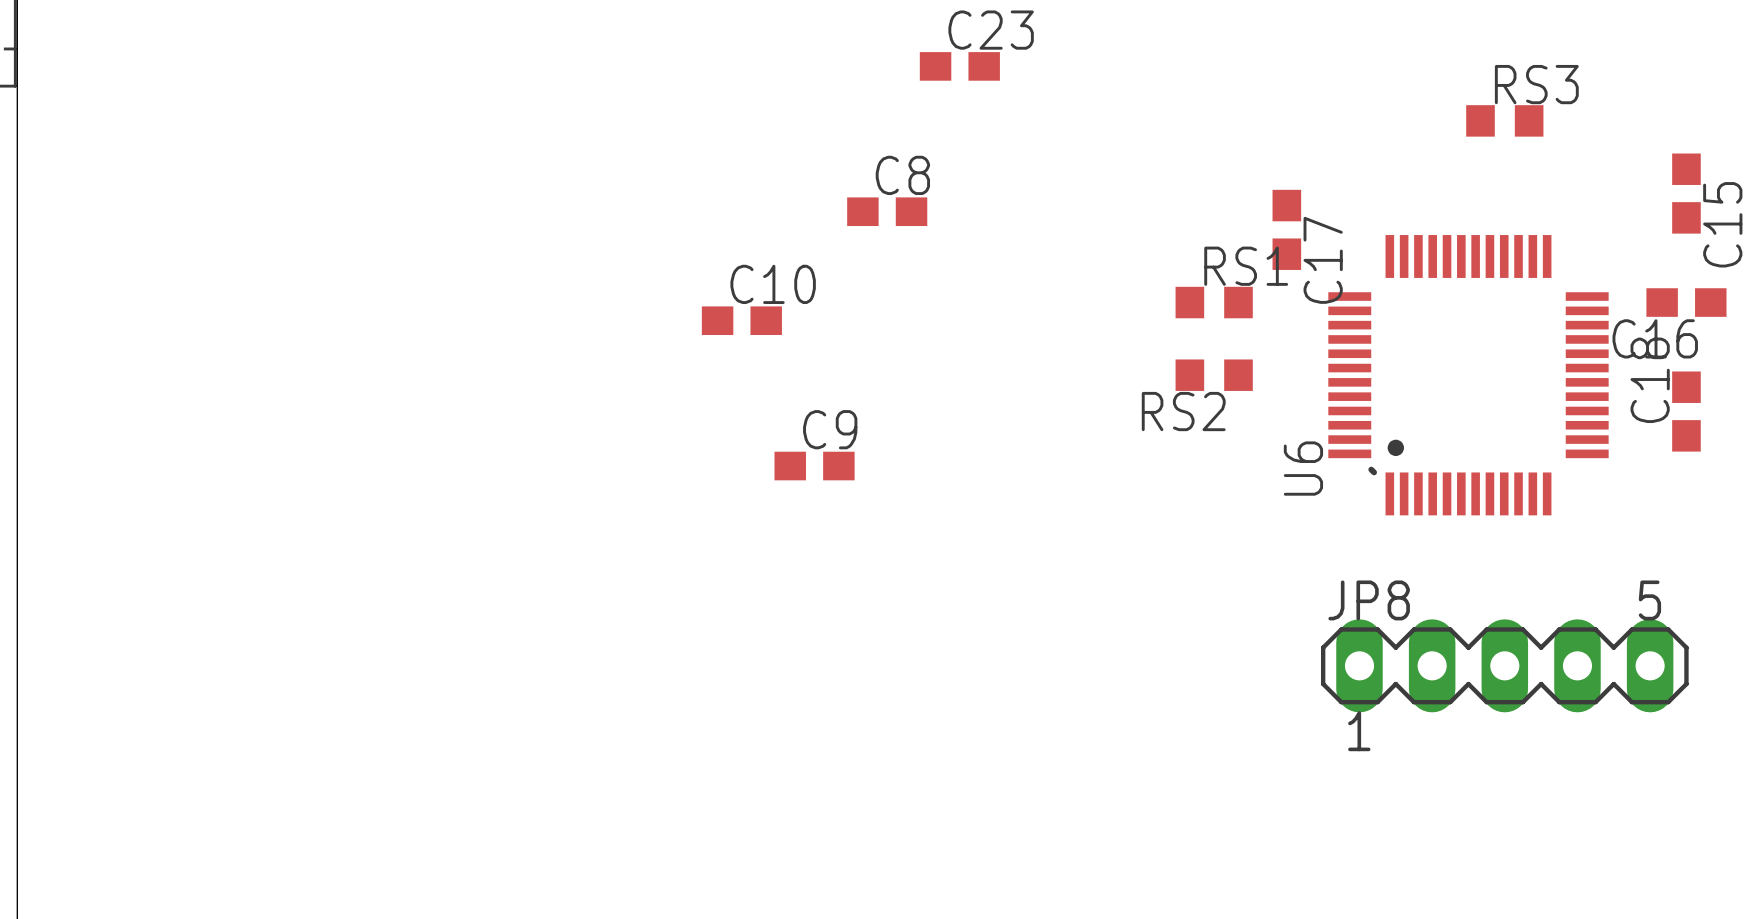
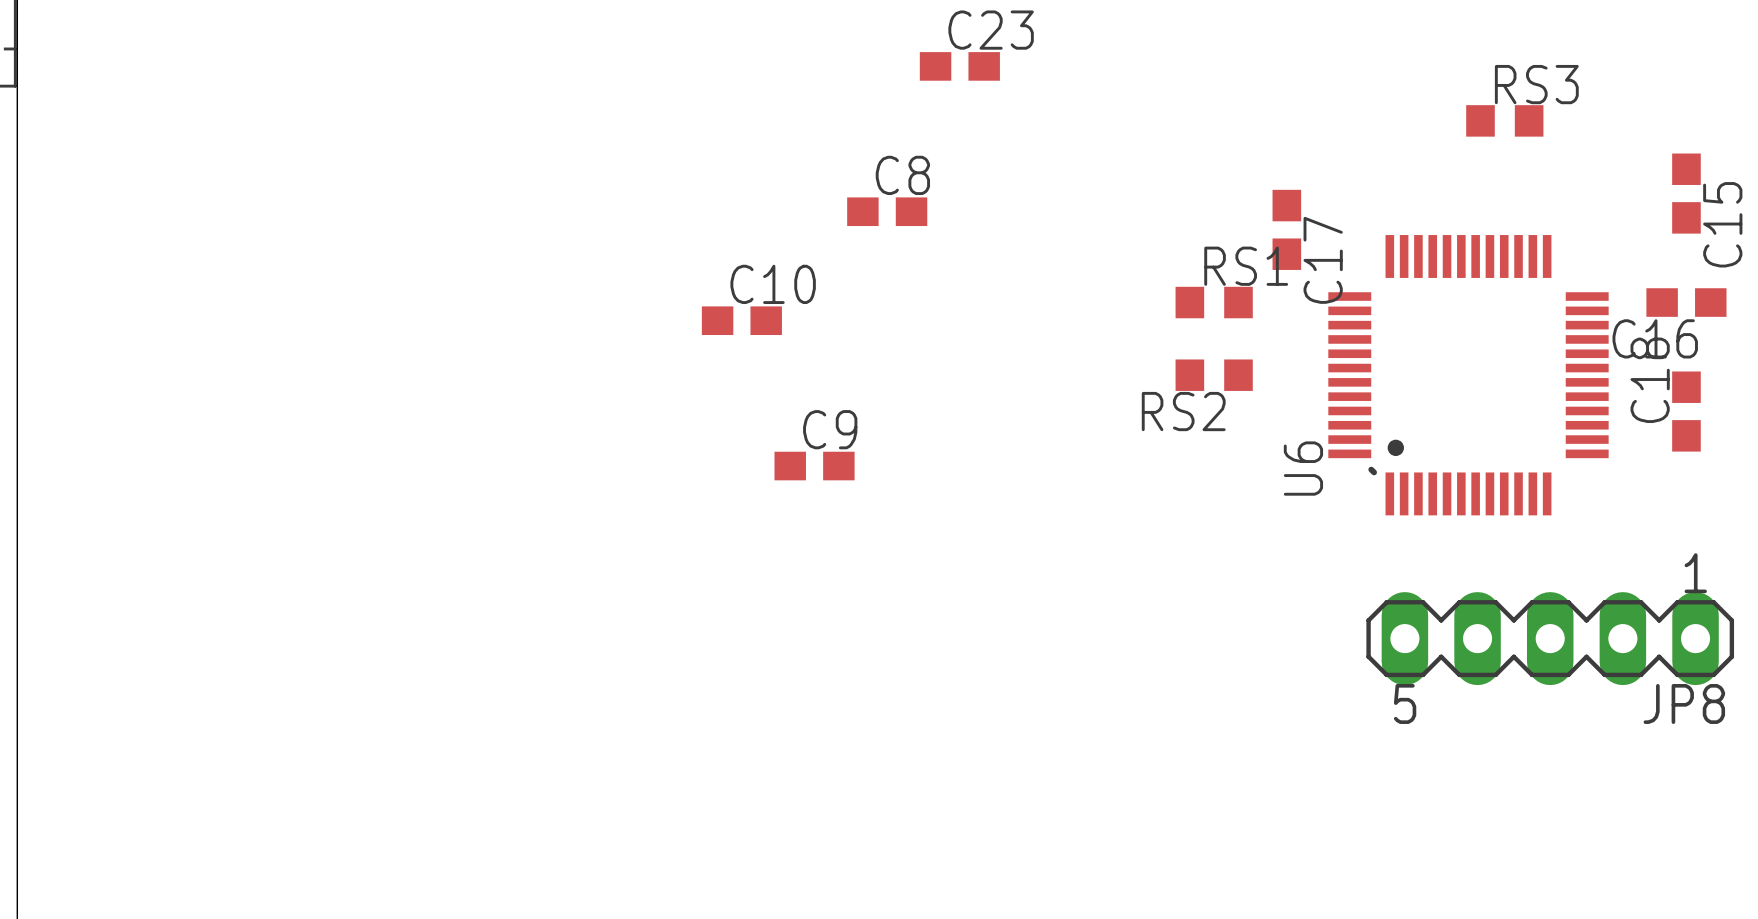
JP8 name position: JP8 (1369, 600) -> JP8 (1684, 703)
JP8 text position: 5 (1649, 600) -> 5 (1405, 703)
JP8 position: (1504, 665) -> (1550, 638)
JP8 text position: 1 (1359, 731) -> 1 (1695, 573)

